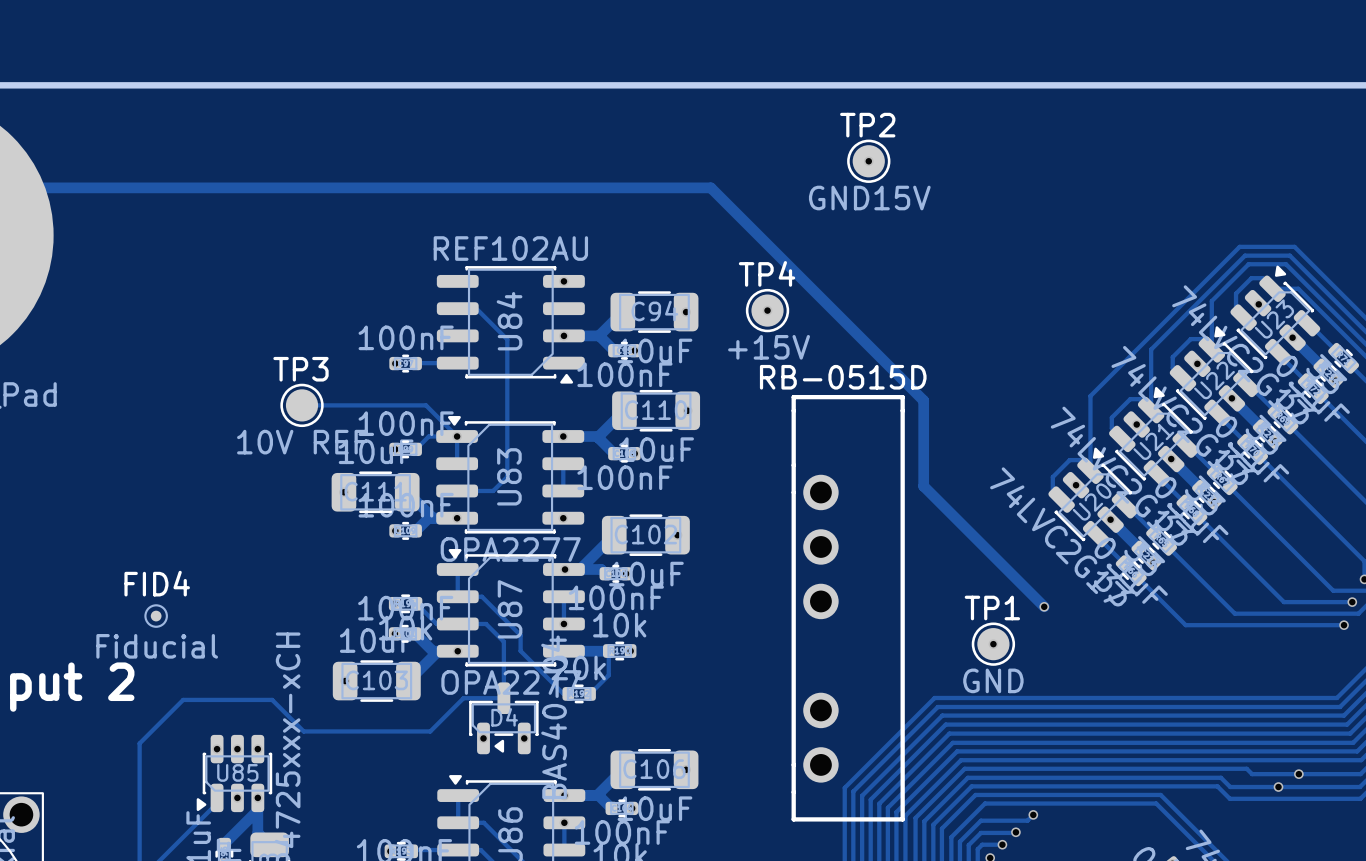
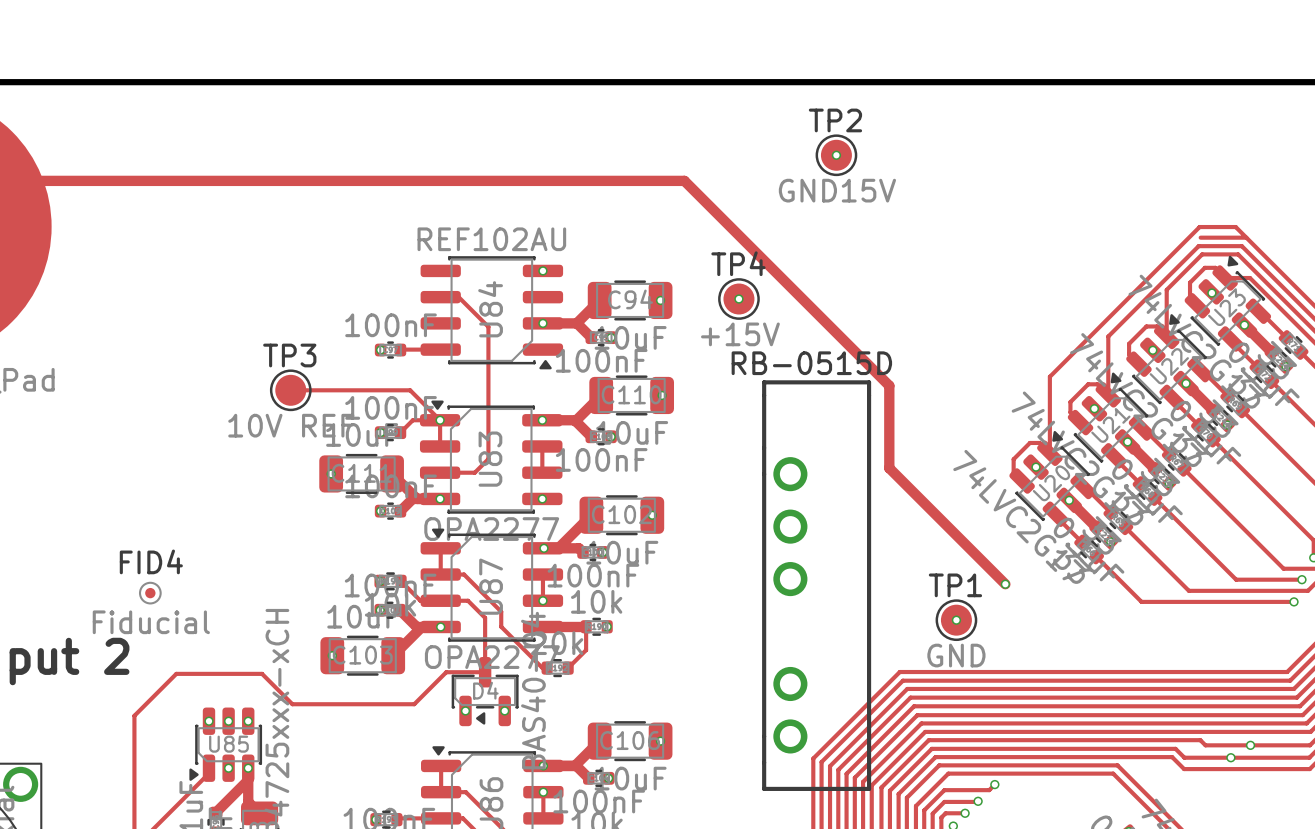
track: (1247, 246) (1239, 246) (1090, 396) -> (1246, 237) (1235, 227) (1199, 227) (1049, 376) (1049, 381)

